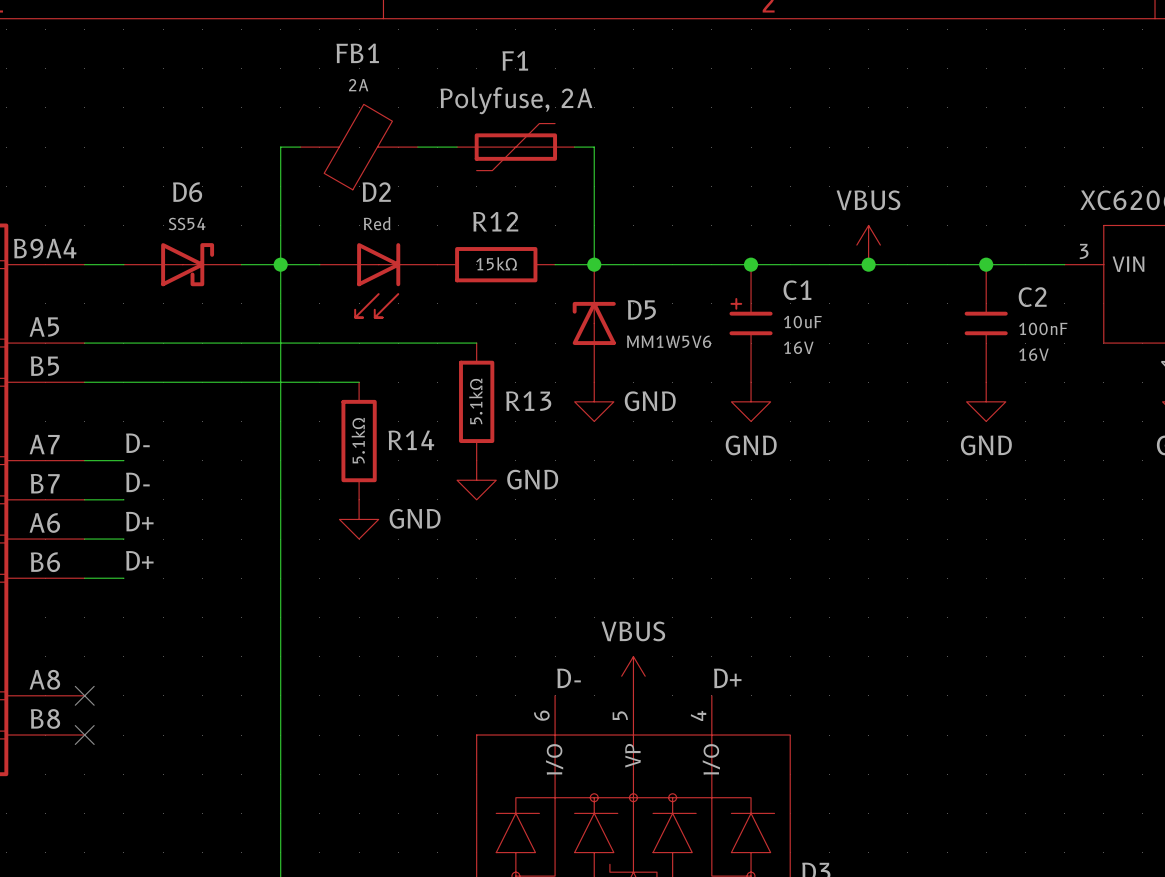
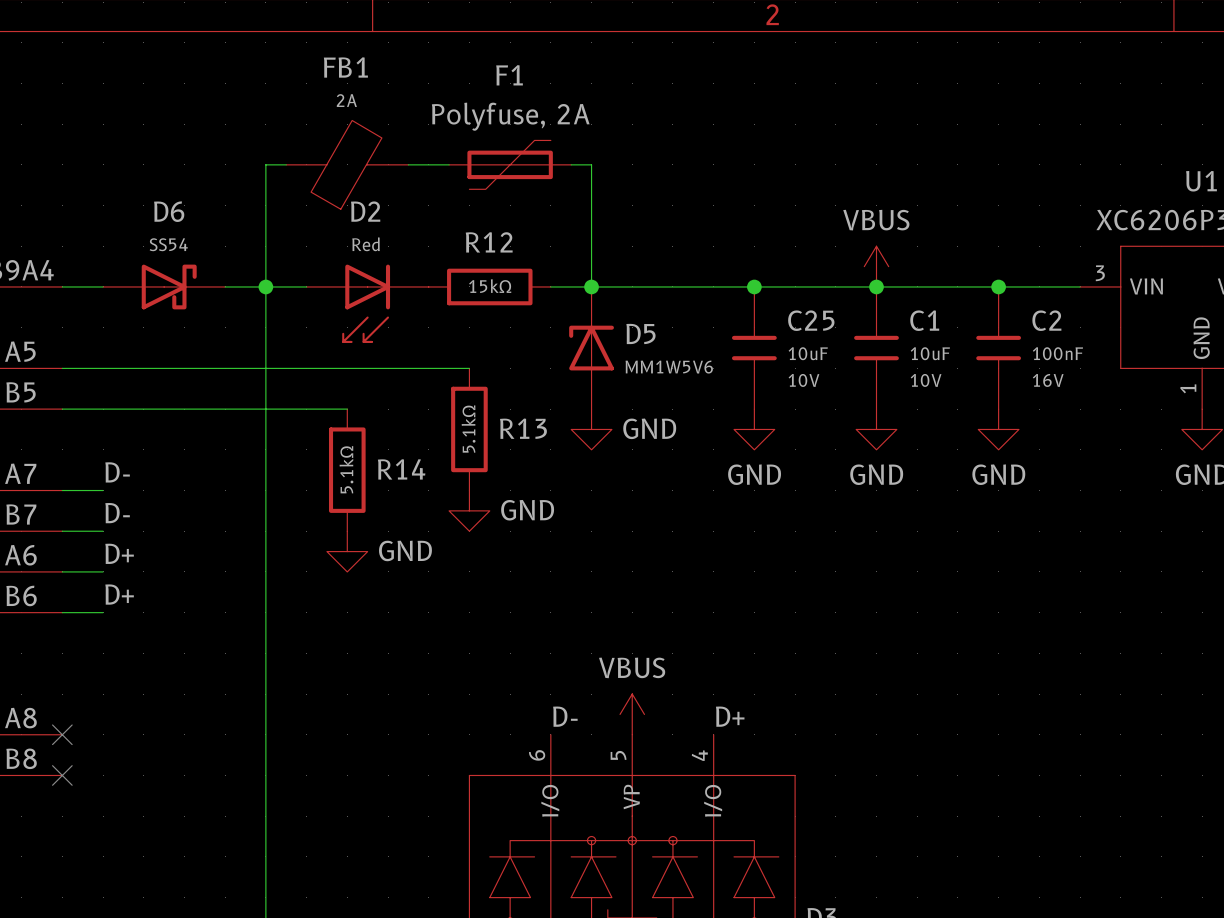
C1 symbol: [729, 264, 773, 383] -> [854, 286, 899, 410]
C25: none -> 10uF (754, 348)
C1 text: 16V (798, 347) -> none
C1 text: none -> 10V (926, 380)
power symbol: none -> GND (876, 429)

